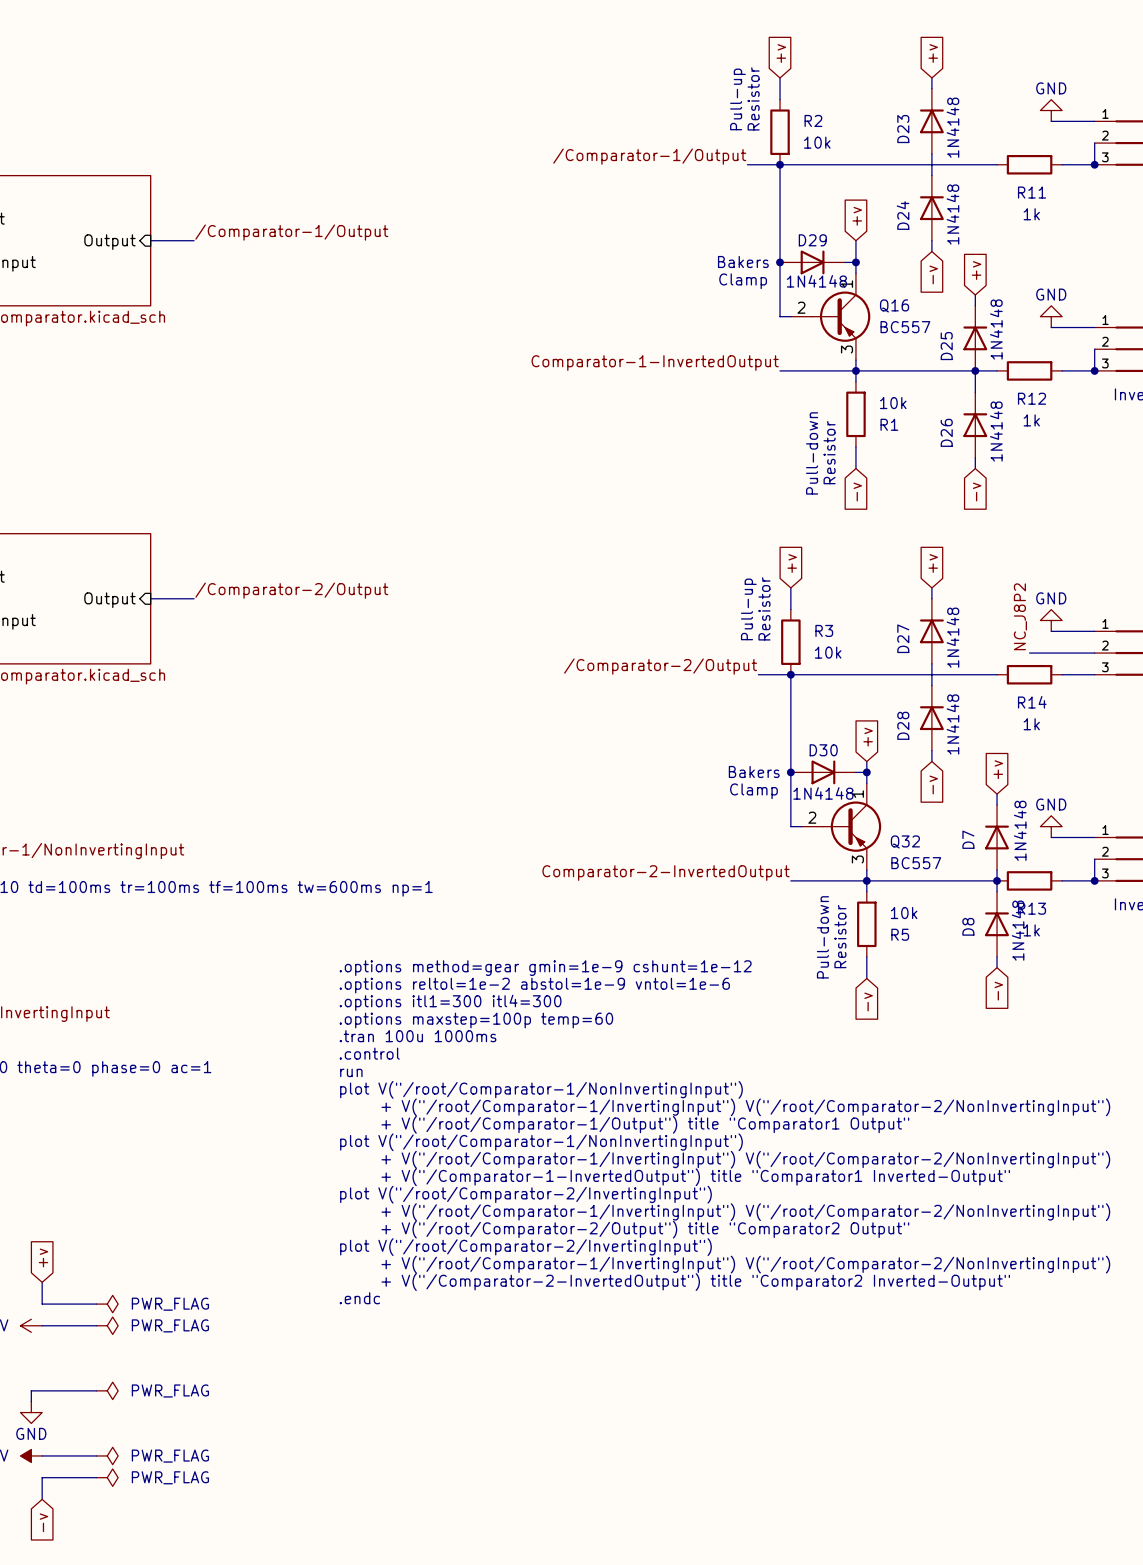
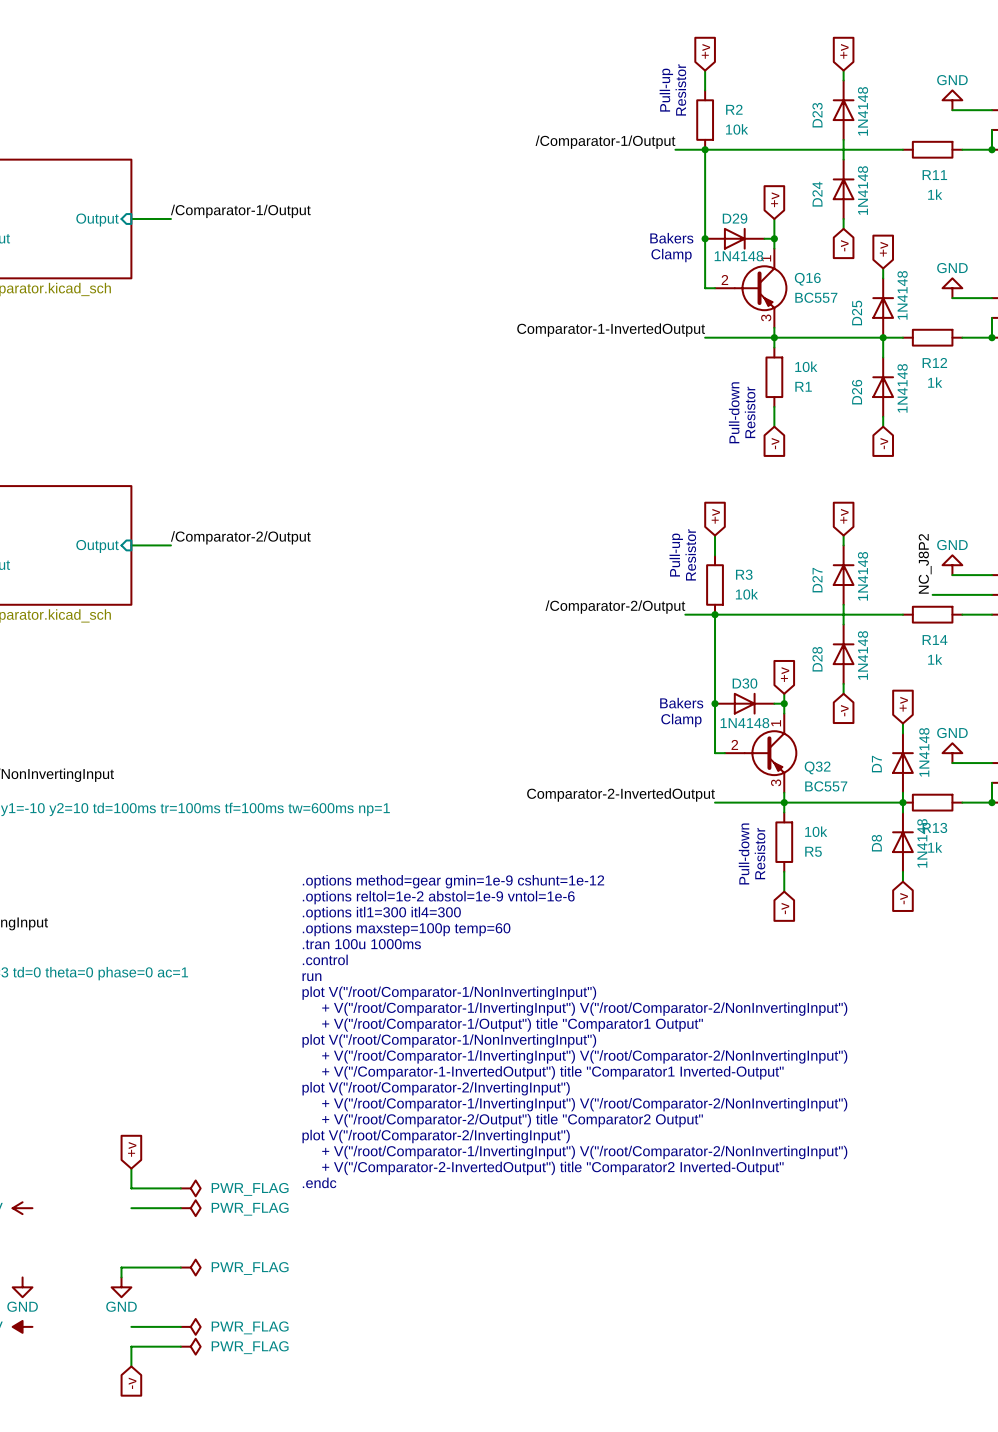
global label position: +v (43, 1257) -> +v (132, 1149)
wire: (42, 1282) (42, 1304) (96, 1304) -> (131, 1168) (131, 1188) (180, 1188)
power symbol: PWR_FLAG (107, 1304) -> none
power symbol: none -> PWR_FLAG (190, 1188)
wire: (42, 1325) (96, 1325) -> (131, 1208) (180, 1208)
power symbol: PWR_FLAG (107, 1325) -> none
power symbol: none -> PWR_FLAG (190, 1208)
wire: (96, 1390) (31, 1390) (31, 1401) -> (180, 1267) (121, 1267) (121, 1277)
power symbol: PWR_FLAG (107, 1390) -> none
power symbol: none -> PWR_FLAG (190, 1267)
power symbol: none -> GND (121, 1287)
wire: (42, 1455) (96, 1455) -> (131, 1326) (180, 1326)
power symbol: PWR_FLAG (107, 1455) -> none
power symbol: none -> PWR_FLAG (190, 1326)
wire: (96, 1477) (42, 1477) (42, 1499) -> (180, 1346) (131, 1346) (131, 1366)
power symbol: PWR_FLAG (107, 1477) -> none
power symbol: none -> PWR_FLAG (190, 1346)
global label position: -v (43, 1522) -> -v (132, 1383)

